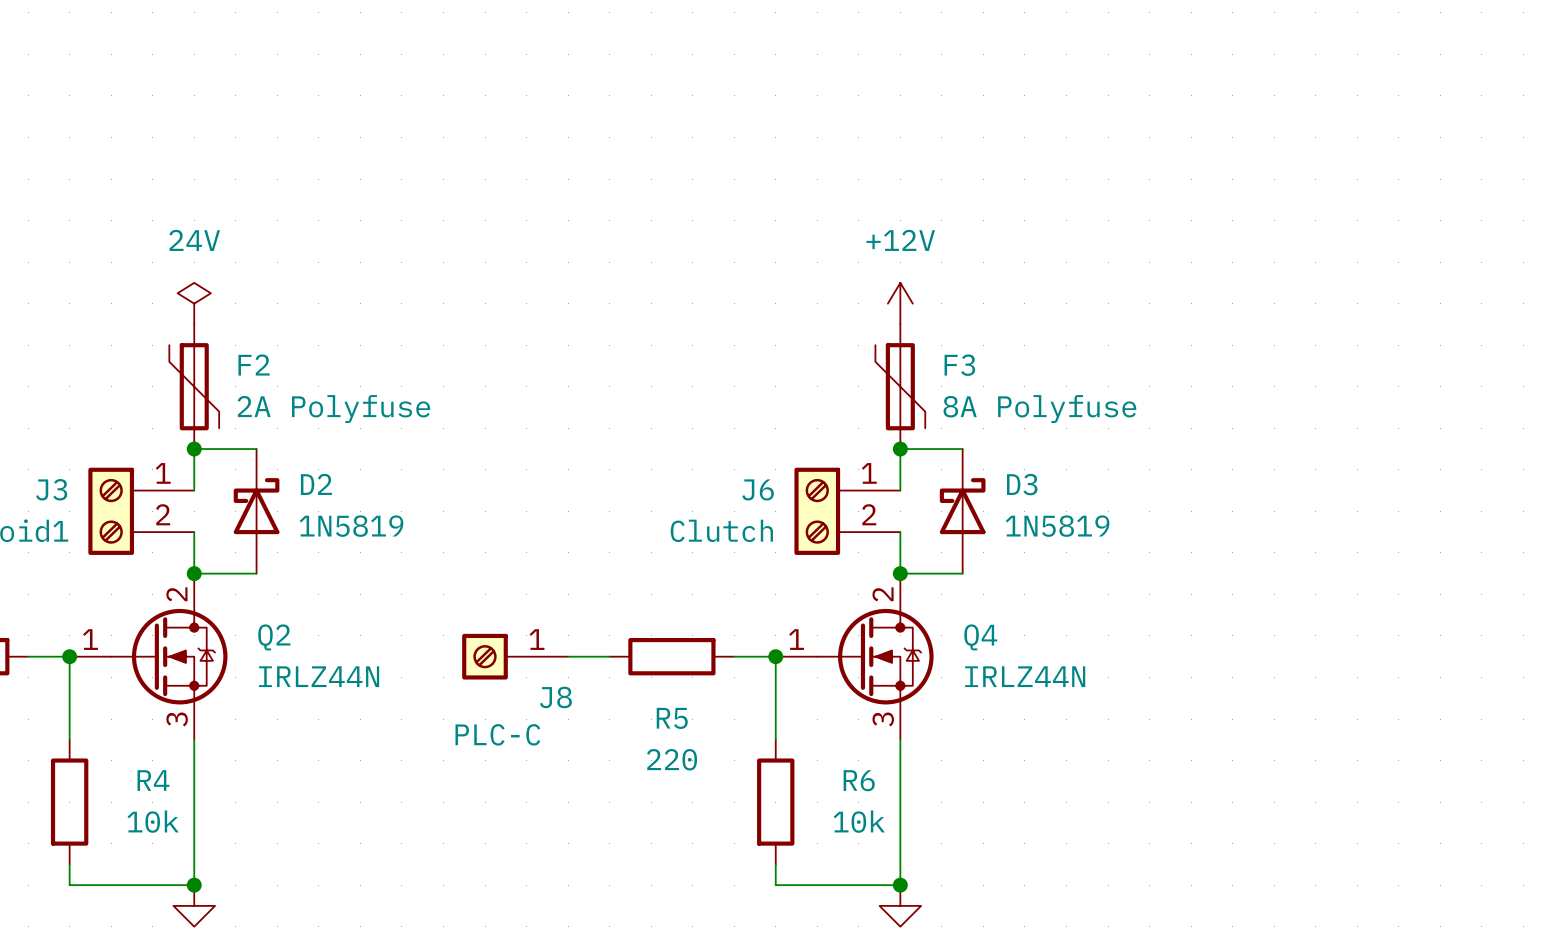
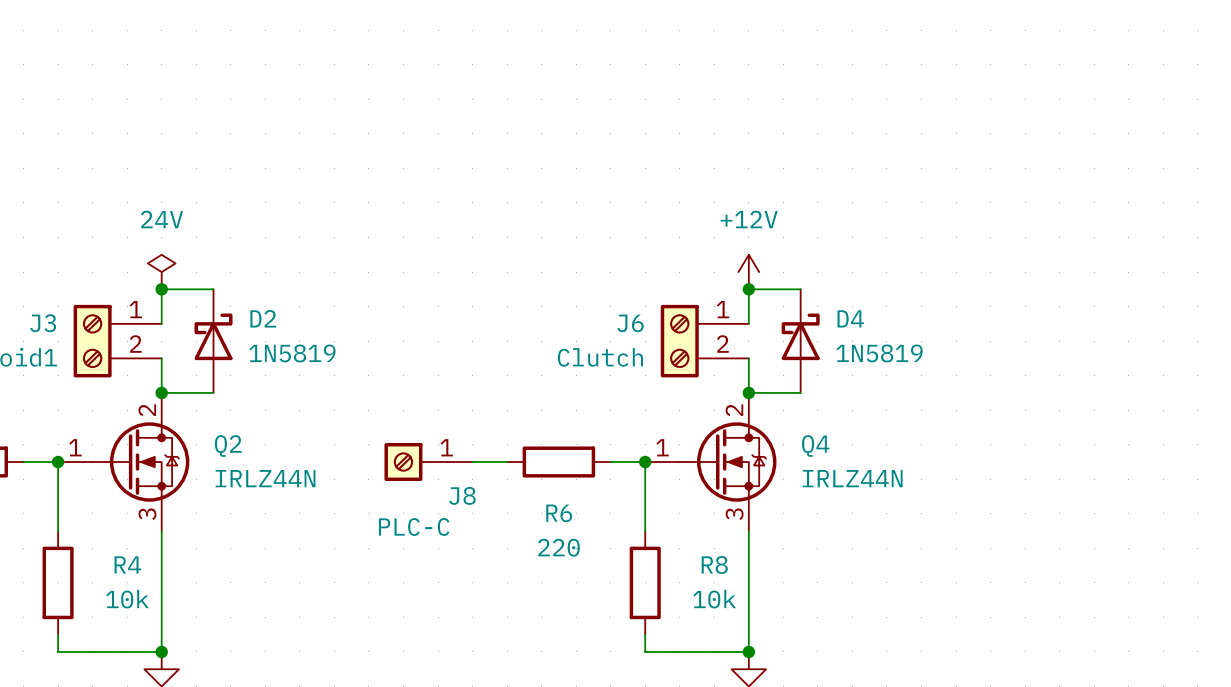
power symbol position: 24V (194, 303) -> 24V (161, 272)
power symbol position: +12V (900, 303) -> +12V (748, 272)
F2: 2A Polyfuse (194, 386) -> none
F3: 8A Polyfuse (900, 386) -> none
D3 name: D3 (1022, 484) -> D4 (850, 318)
R5 name: R5 (672, 718) -> R6 (559, 513)
R6 name: R6 (859, 780) -> R8 (714, 564)

